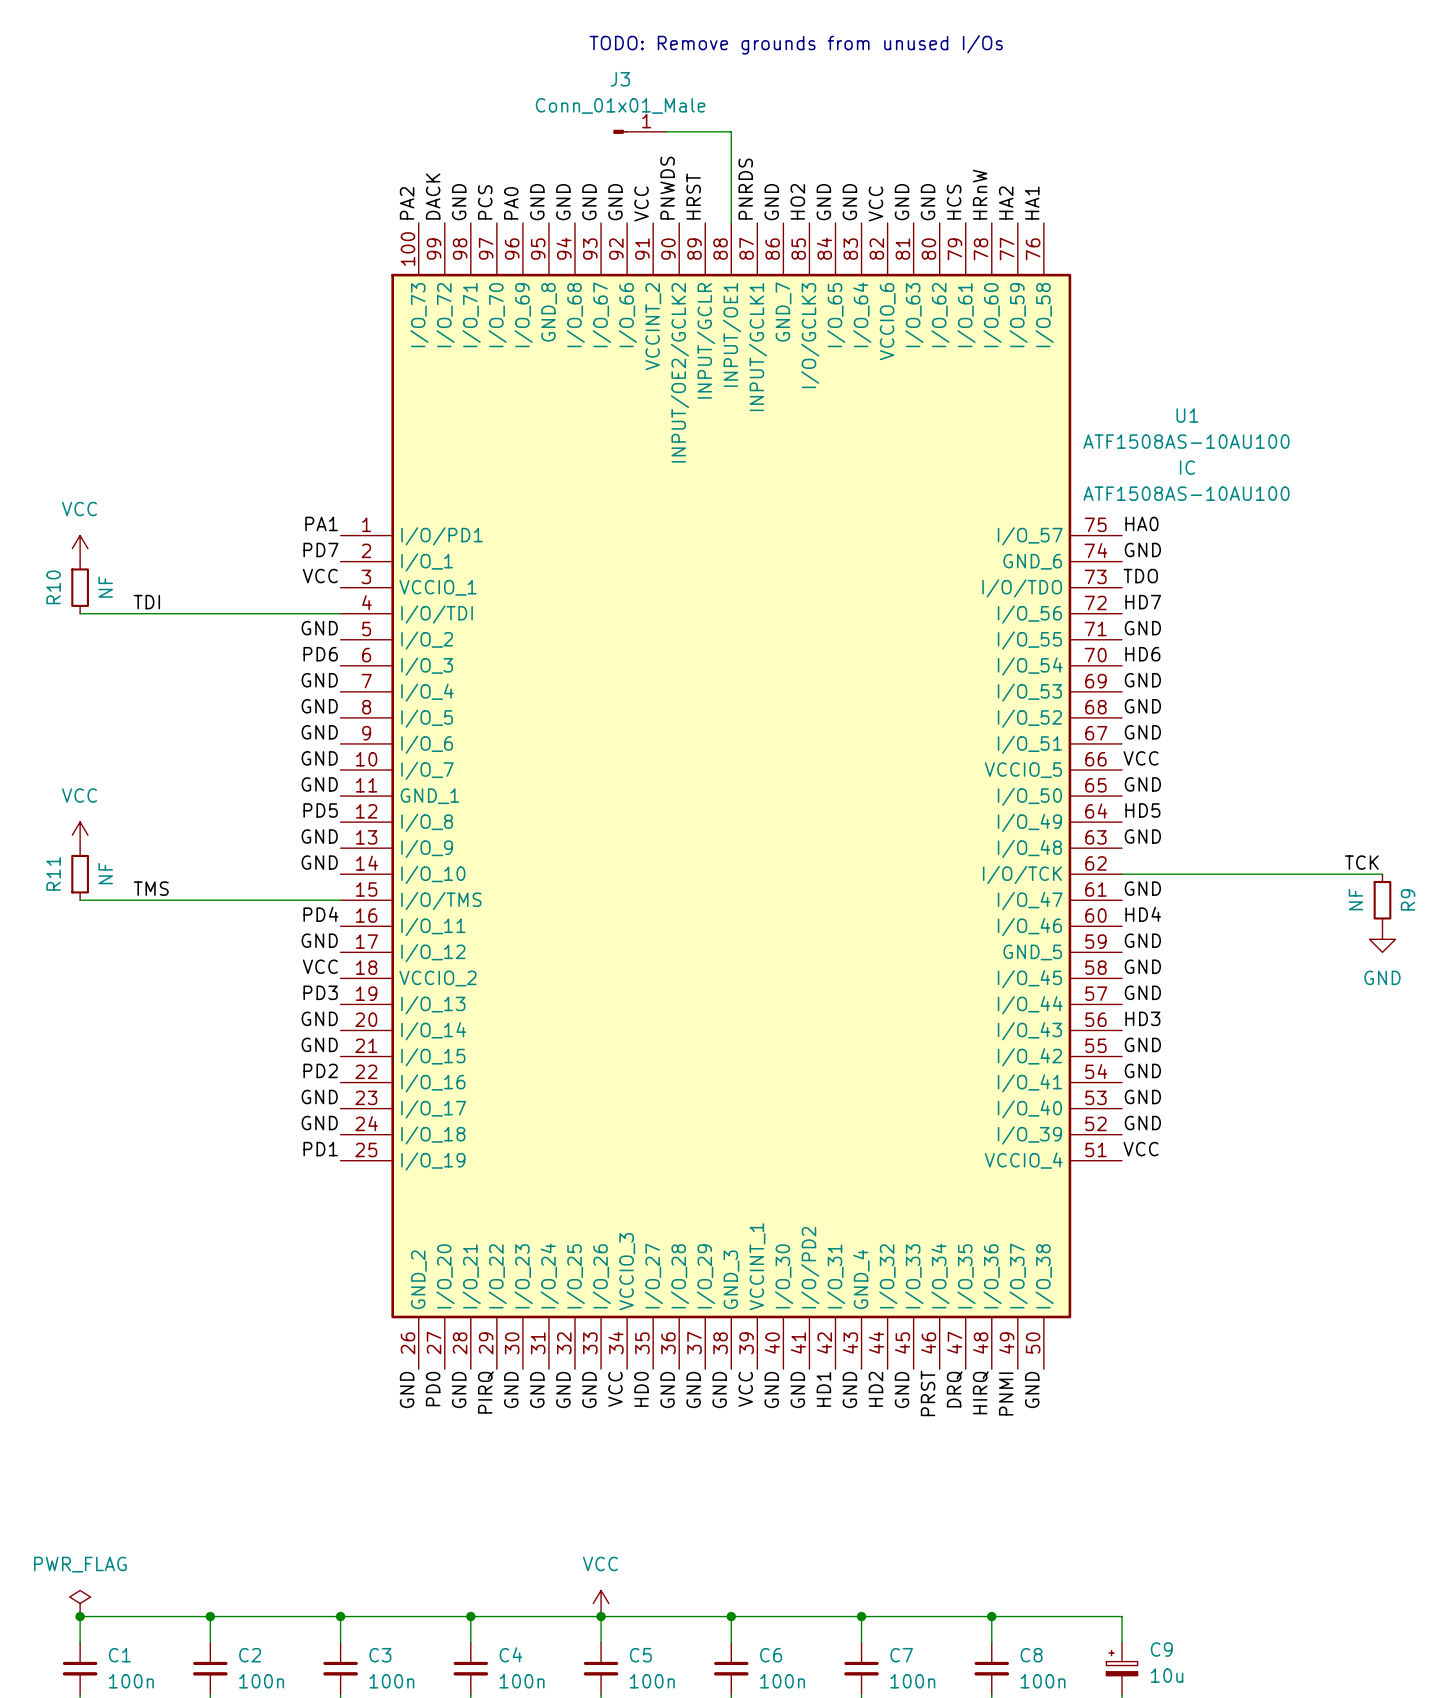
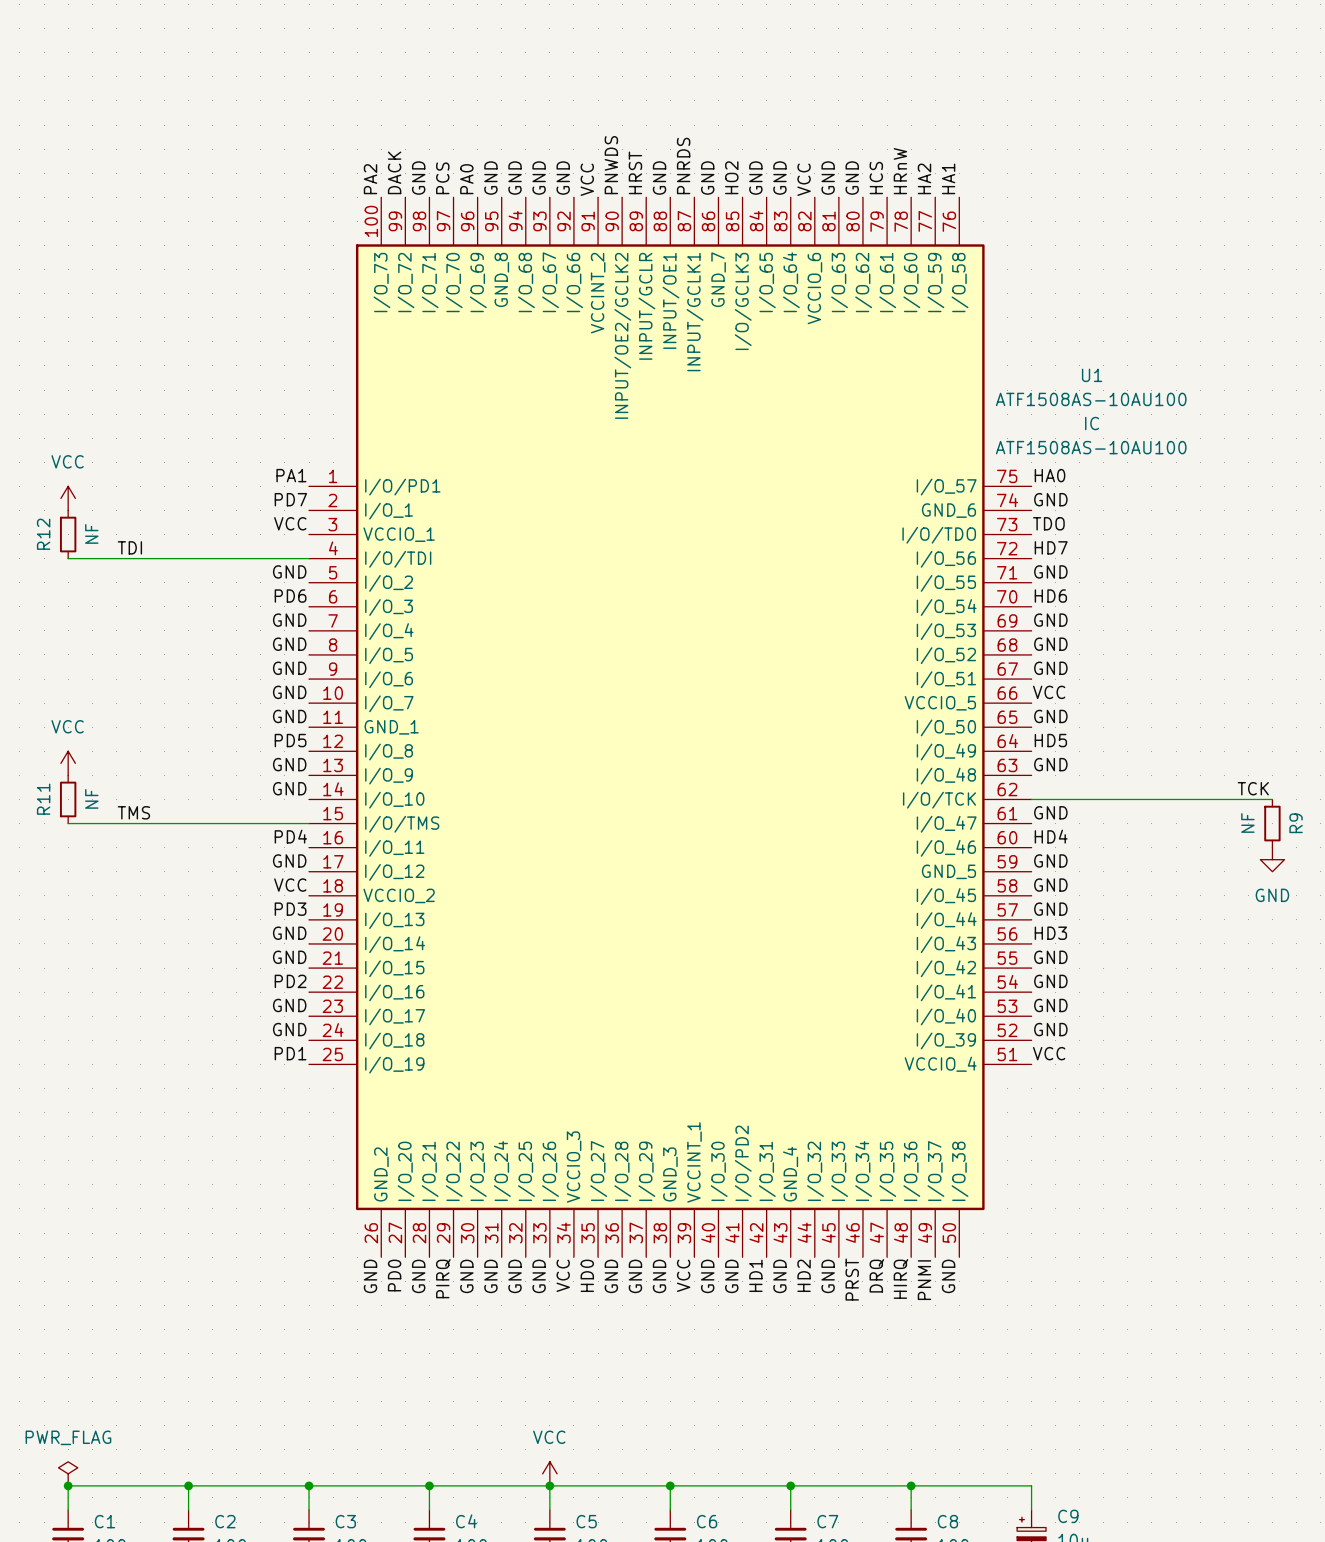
text: TODO: Remove grounds from unused I/Os (796, 44) -> none
J3: Conn_01x01_Male (639, 131) -> none
wire: (666, 131) (731, 131) (731, 223) -> none
label: none -> GND (659, 178)
R10 name: R10 (53, 587) -> R12 (43, 534)

